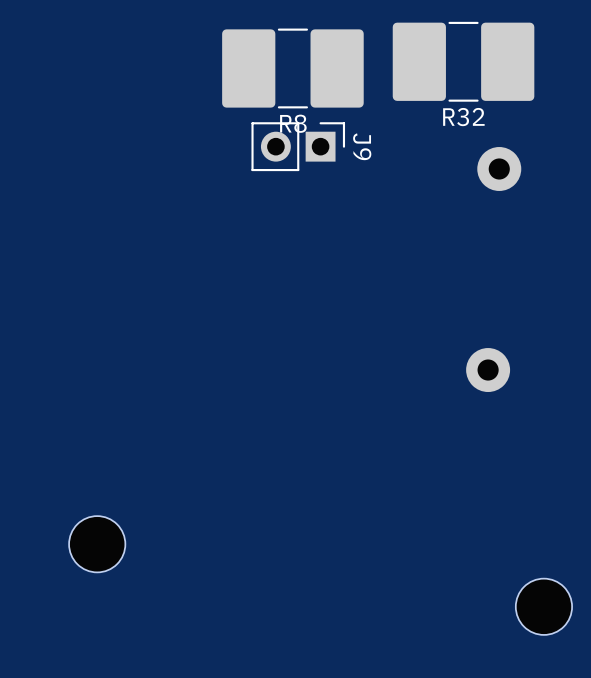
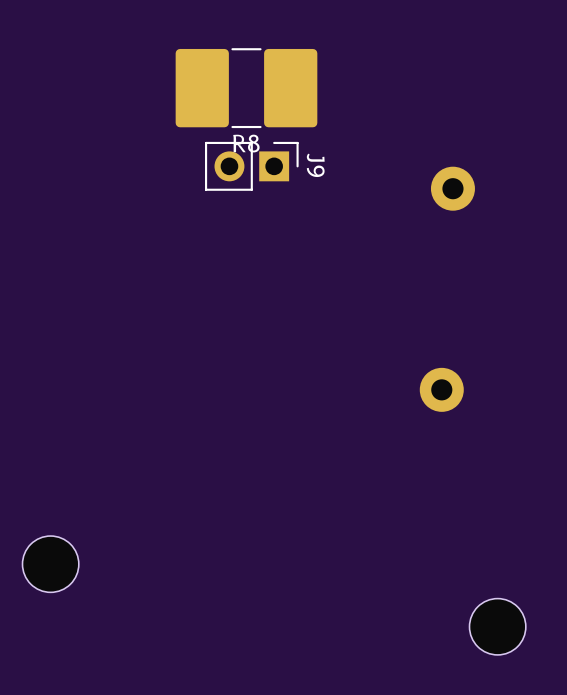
R32: (463, 61) -> none

